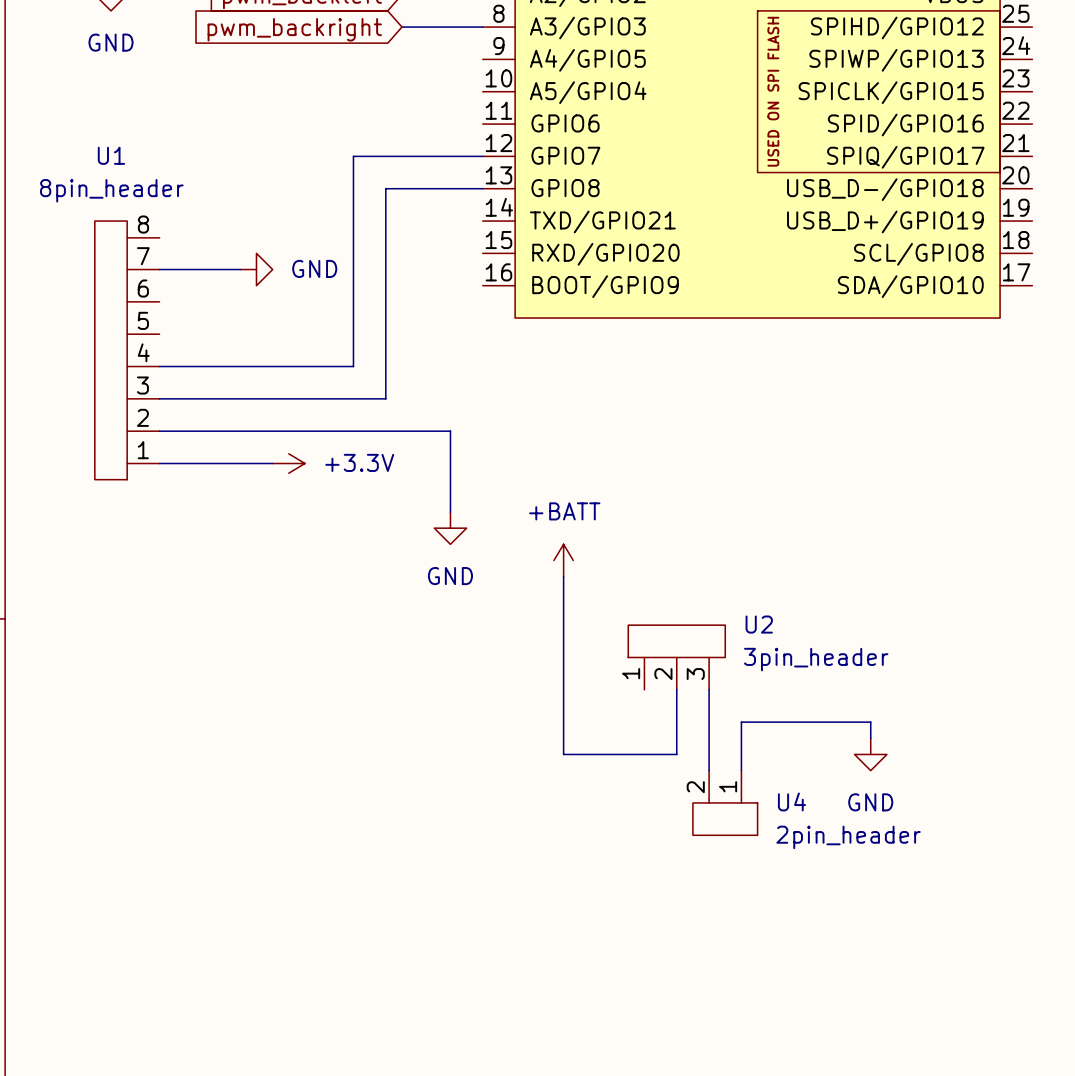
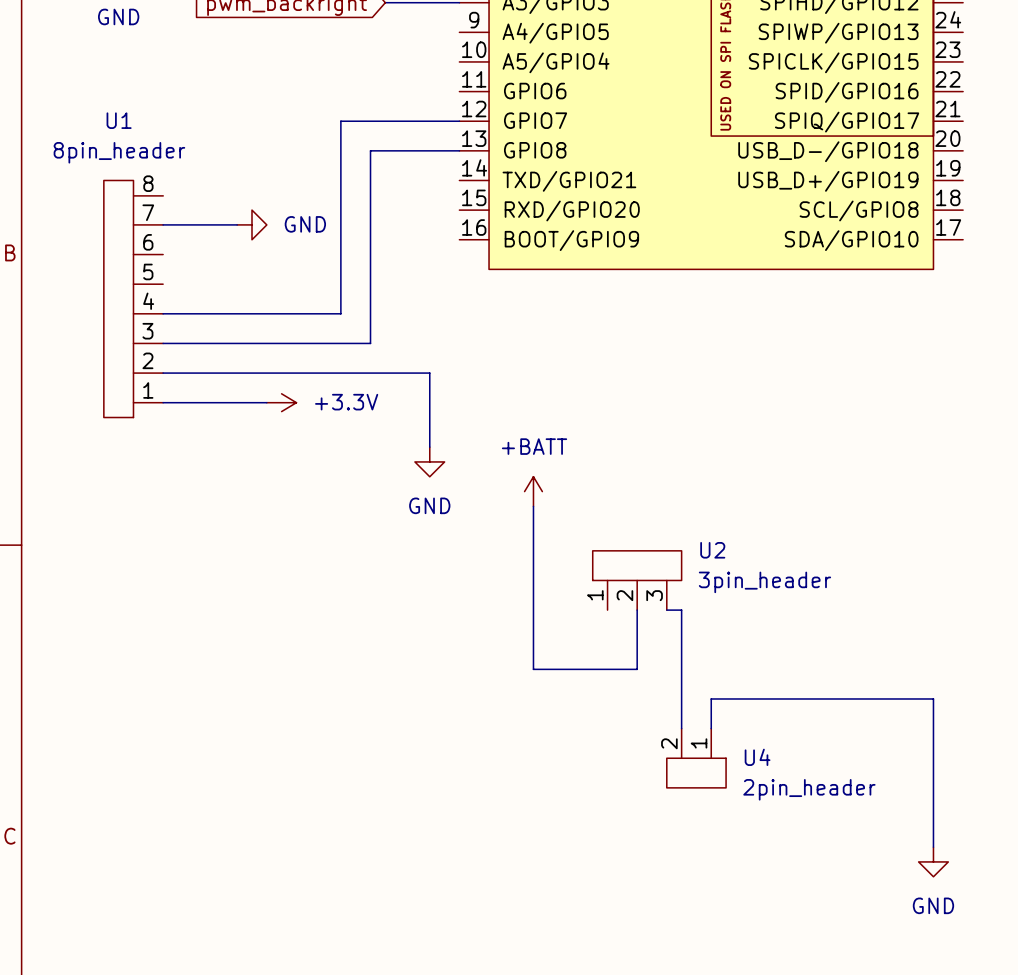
wire: (709, 689) (709, 770) -> (666, 610) (681, 610) (681, 728)
wire: (870, 738) (870, 722) (741, 722) (741, 770) -> none
power symbol position: GND (870, 754) -> GND (933, 861)
U4 position: (725, 802) -> (696, 758)
wire: none -> (711, 728) (711, 698) (933, 698) (933, 847)

